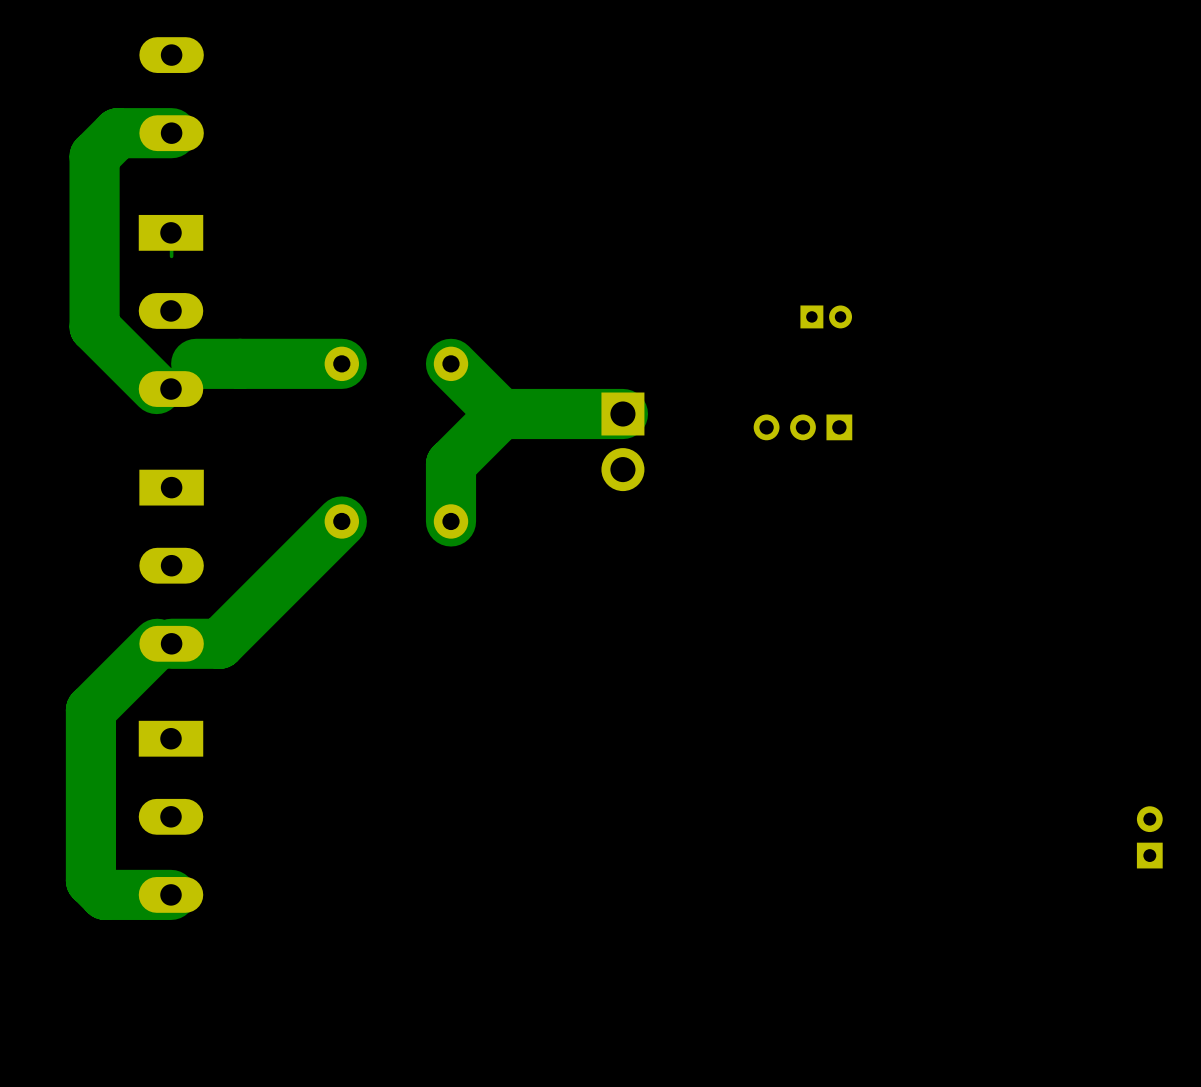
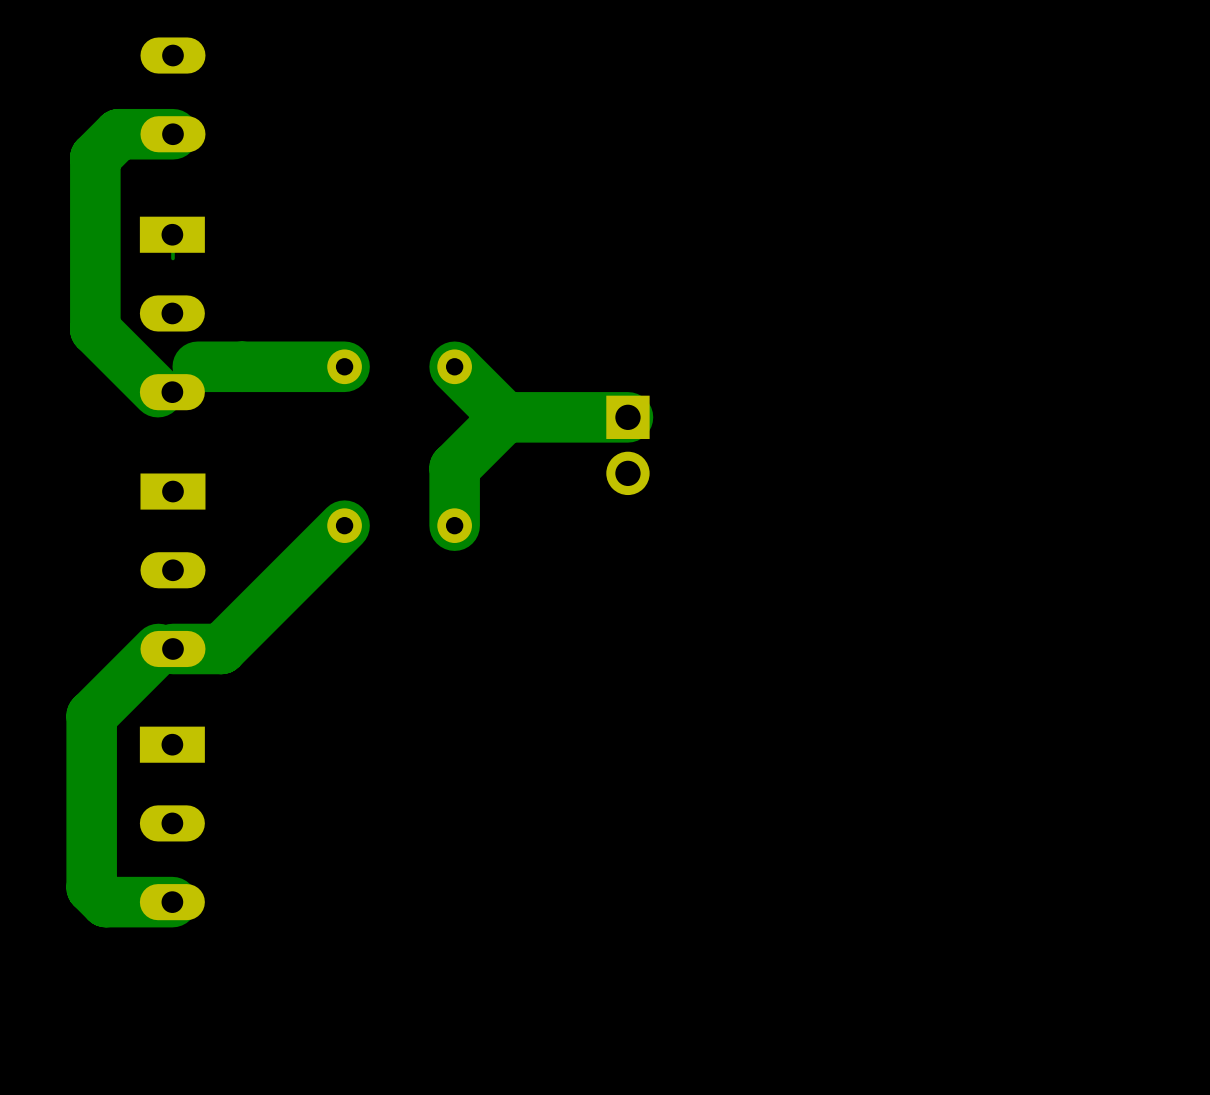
part: (826, 316) -> none
part: (802, 427) -> none
part: (1149, 837) -> none

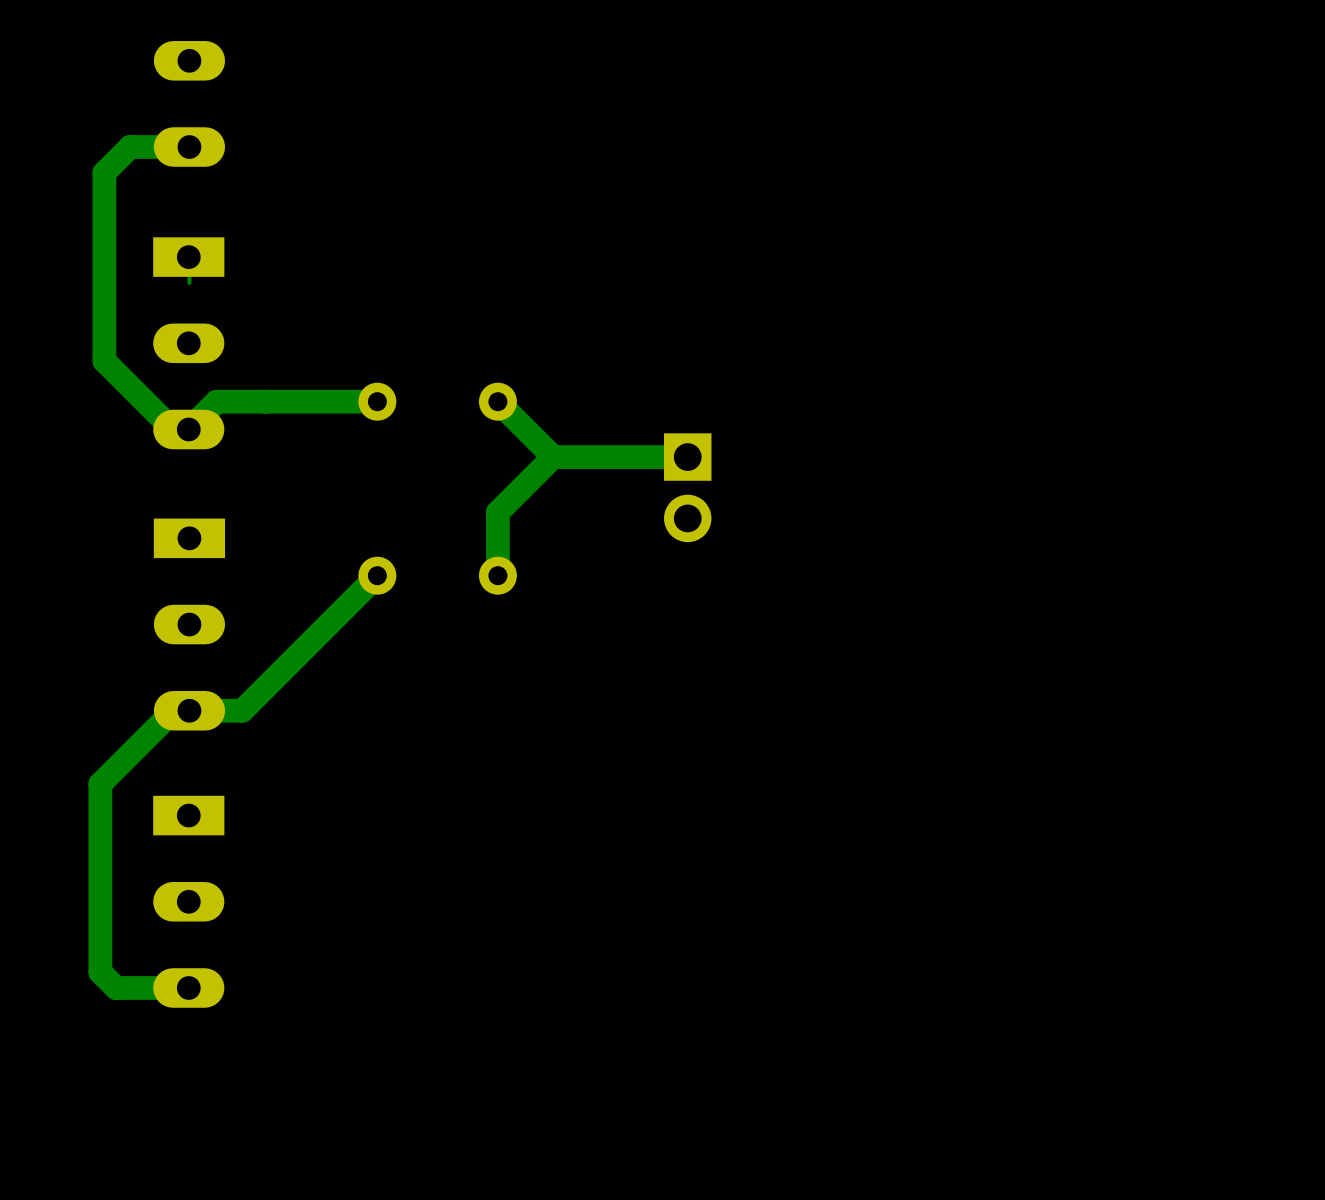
track width: thick (172, 134) (118, 134) (95, 157) (95, 329) (157, 392) -> thin (189, 147) (130, 147) (104, 172) (104, 360) (172, 429)
track width: thick (344, 366) (197, 366) -> thin (377, 401) (216, 401)
track width: thick (454, 366) (505, 417) -> thin (497, 401) (553, 457)
track width: thick (505, 417) (454, 467) (454, 525) -> thin (553, 457) (497, 512) (497, 575)
track width: thick (627, 417) (505, 417) -> thin (687, 457) (553, 457)
track width: thick (344, 525) (221, 648) (172, 648) -> thin (377, 575) (242, 710) (189, 710)
track width: thick (158, 648) (91, 715) (91, 887) (106, 902) (172, 902) -> thin (173, 710) (100, 783) (100, 972) (116, 987) (188, 987)

